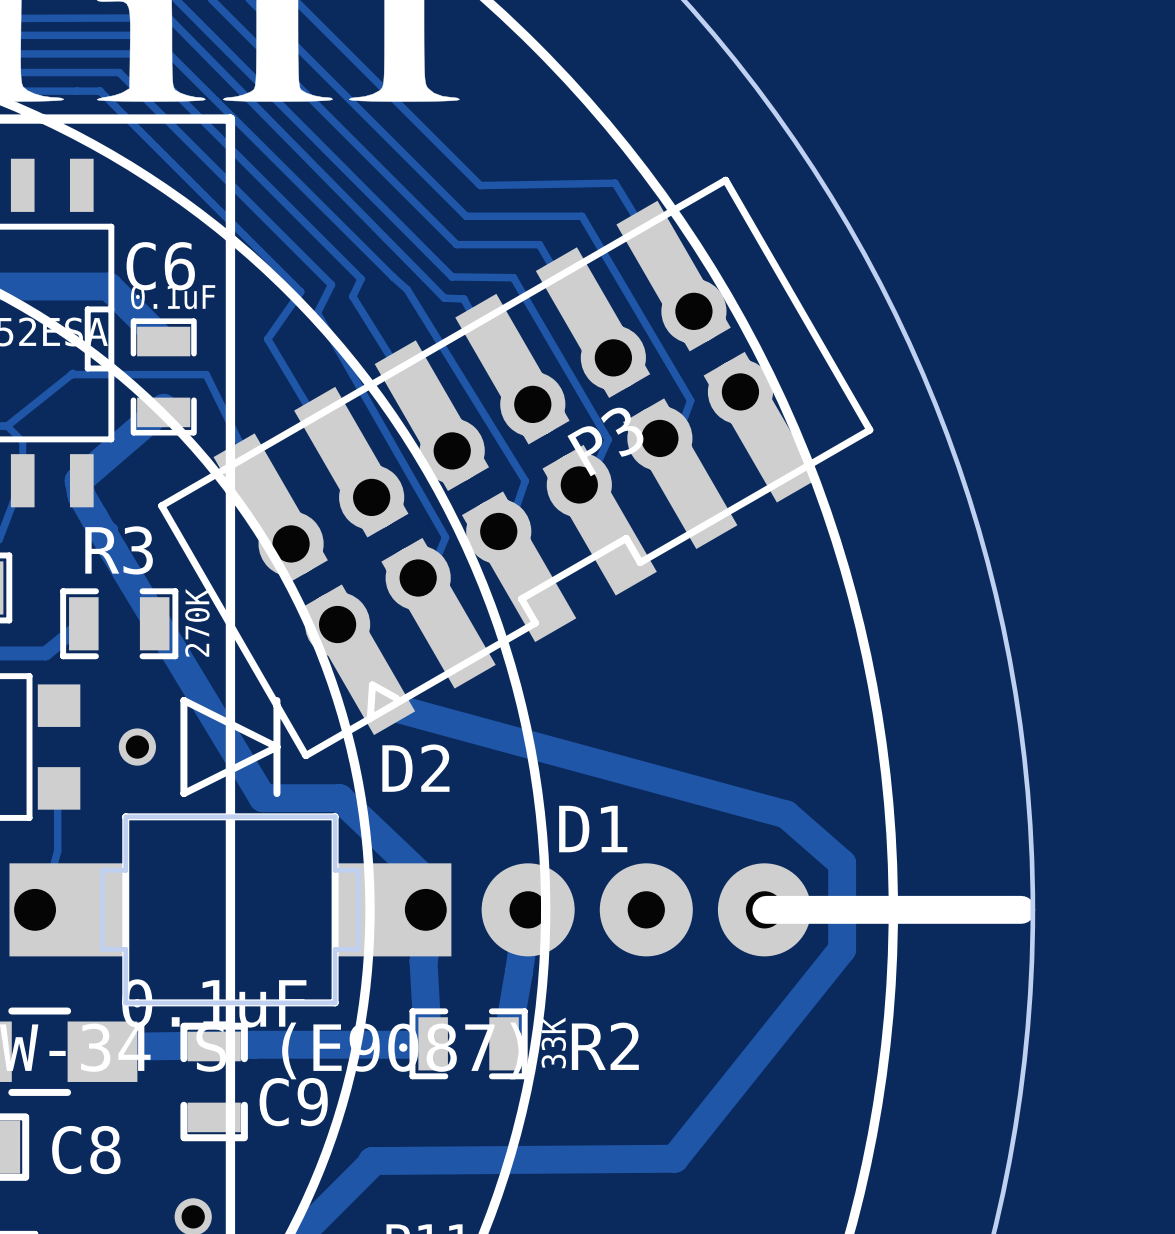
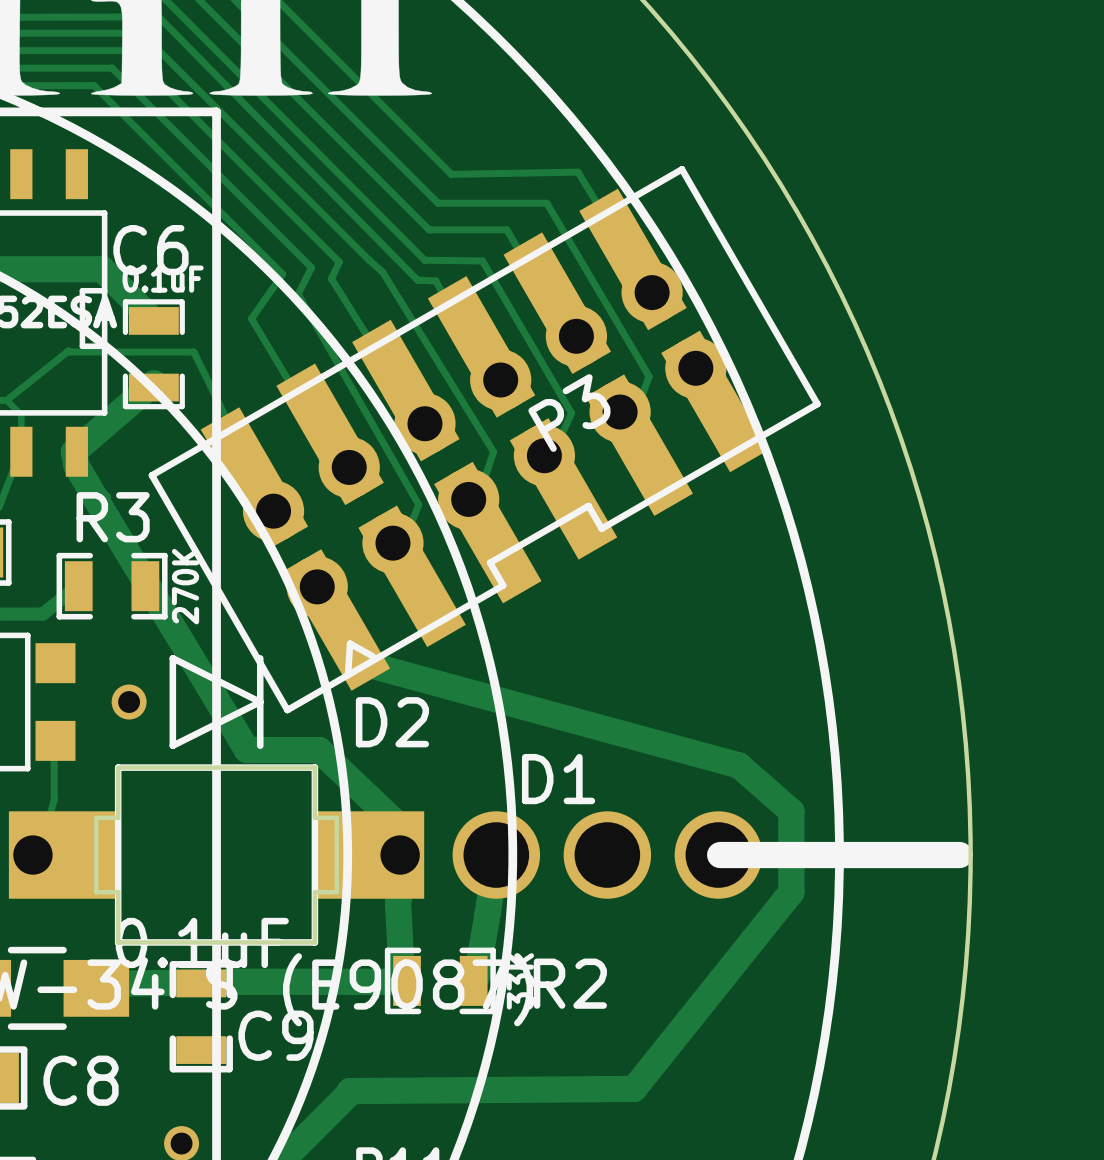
D1 footprint: [481, 863, 811, 957] -> [452, 811, 763, 899]

